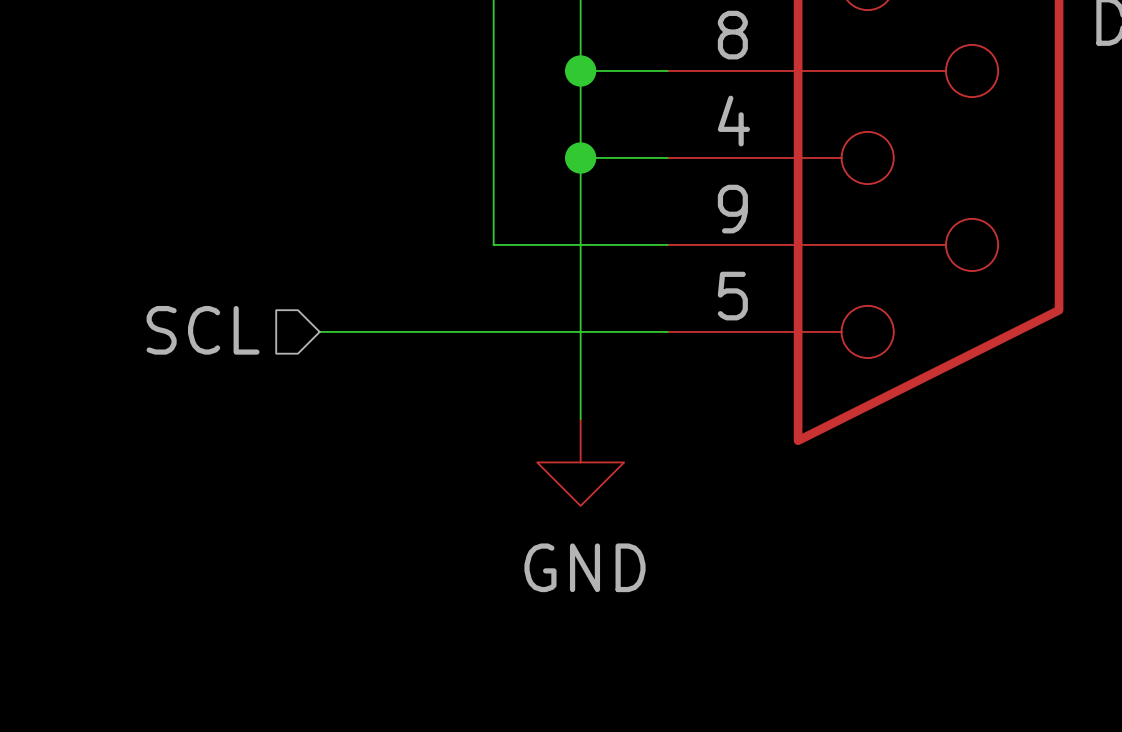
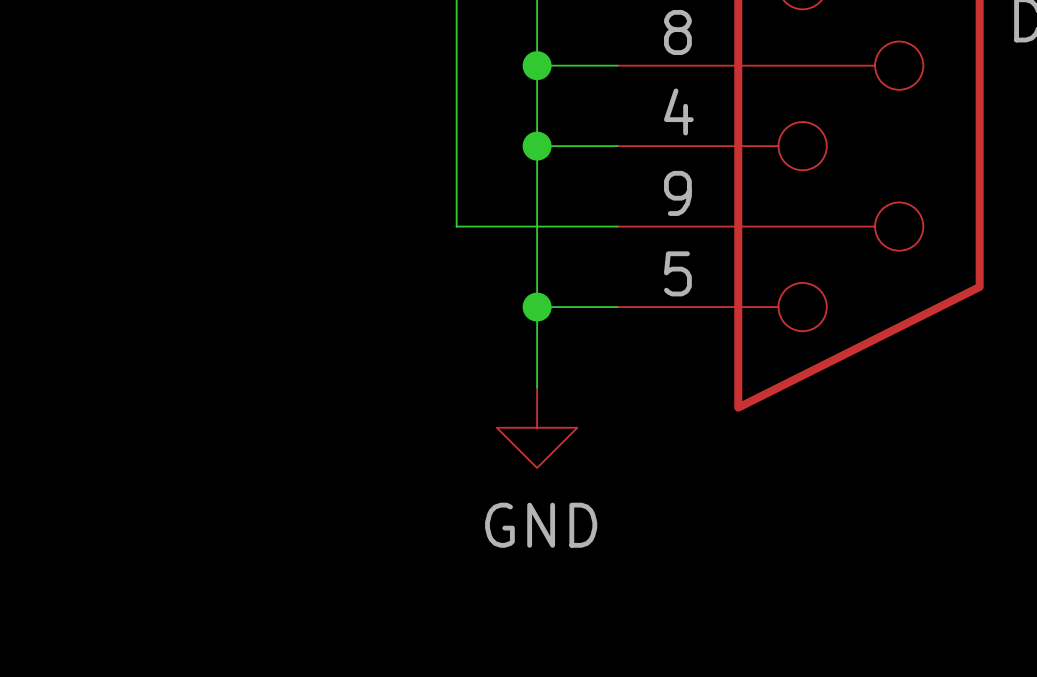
hierarchical label: SCL (203, 330) -> none
wire: (319, 331) (580, 331) -> none
junction: none -> (537, 307)

